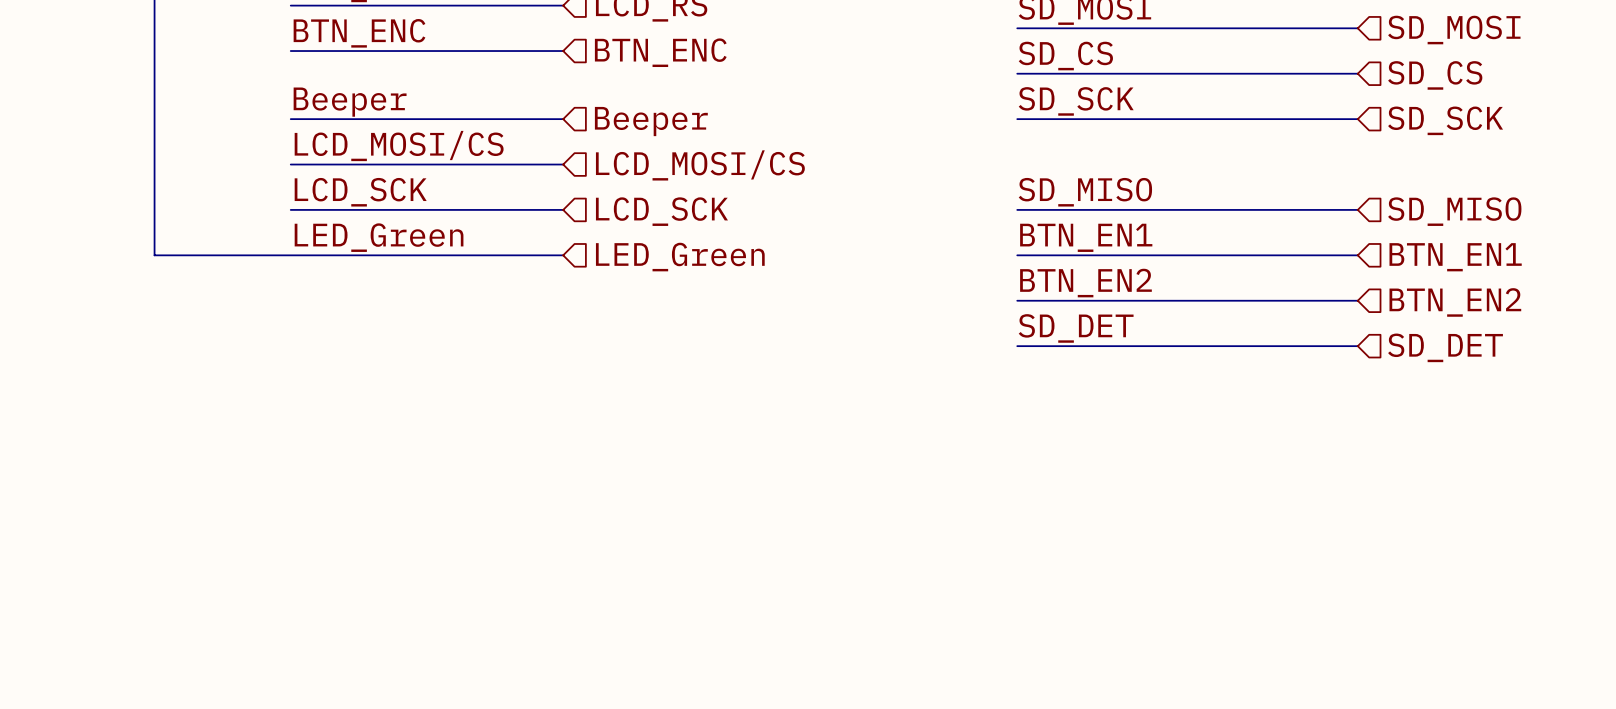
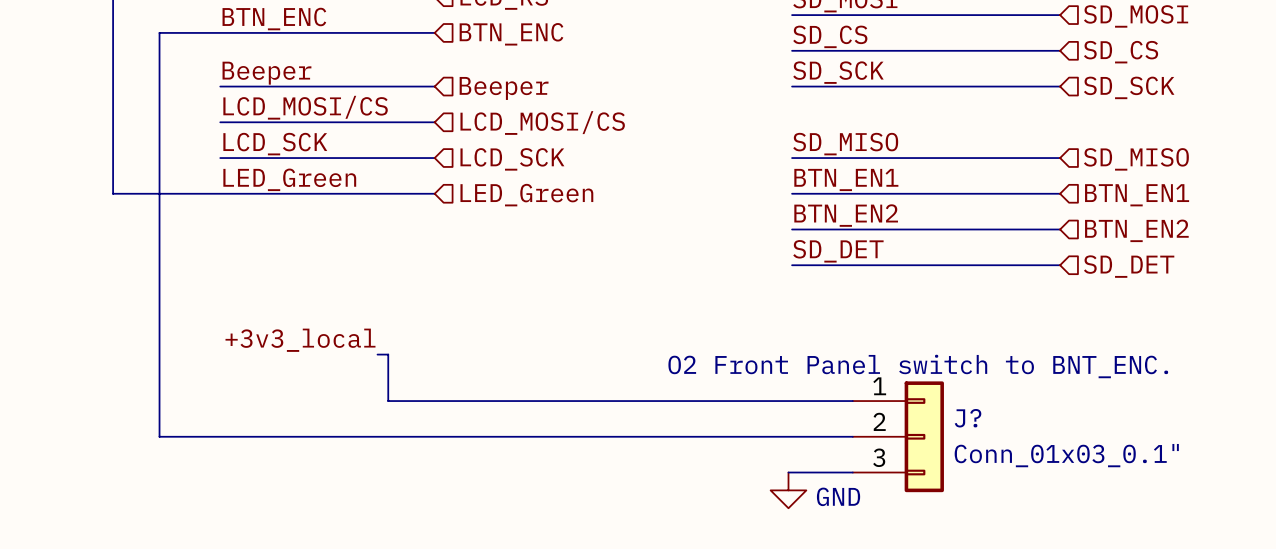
wire: none -> (220, 32) (159, 32) (159, 436) (852, 436)
label: none -> +3v3_local (300, 340)
wire: none -> (377, 354) (388, 354) (388, 401) (852, 401)
text: none -> O2 Front Panel switch to BNT_ENC. (918, 366)
J?: none -> Conn_01x03_0.1" (898, 436)
wire: none -> (788, 472) (852, 472)
power symbol: none -> GND (788, 490)

